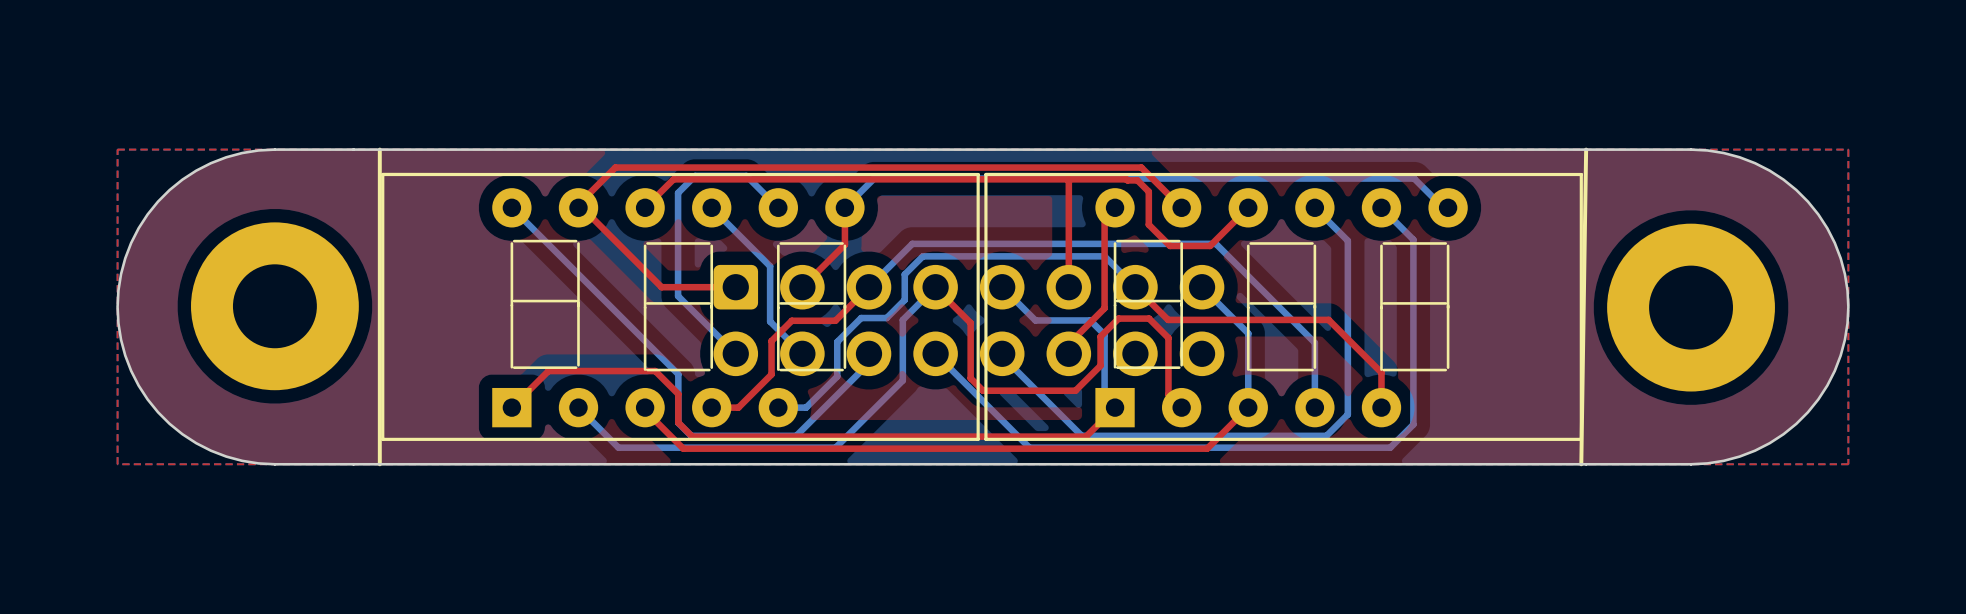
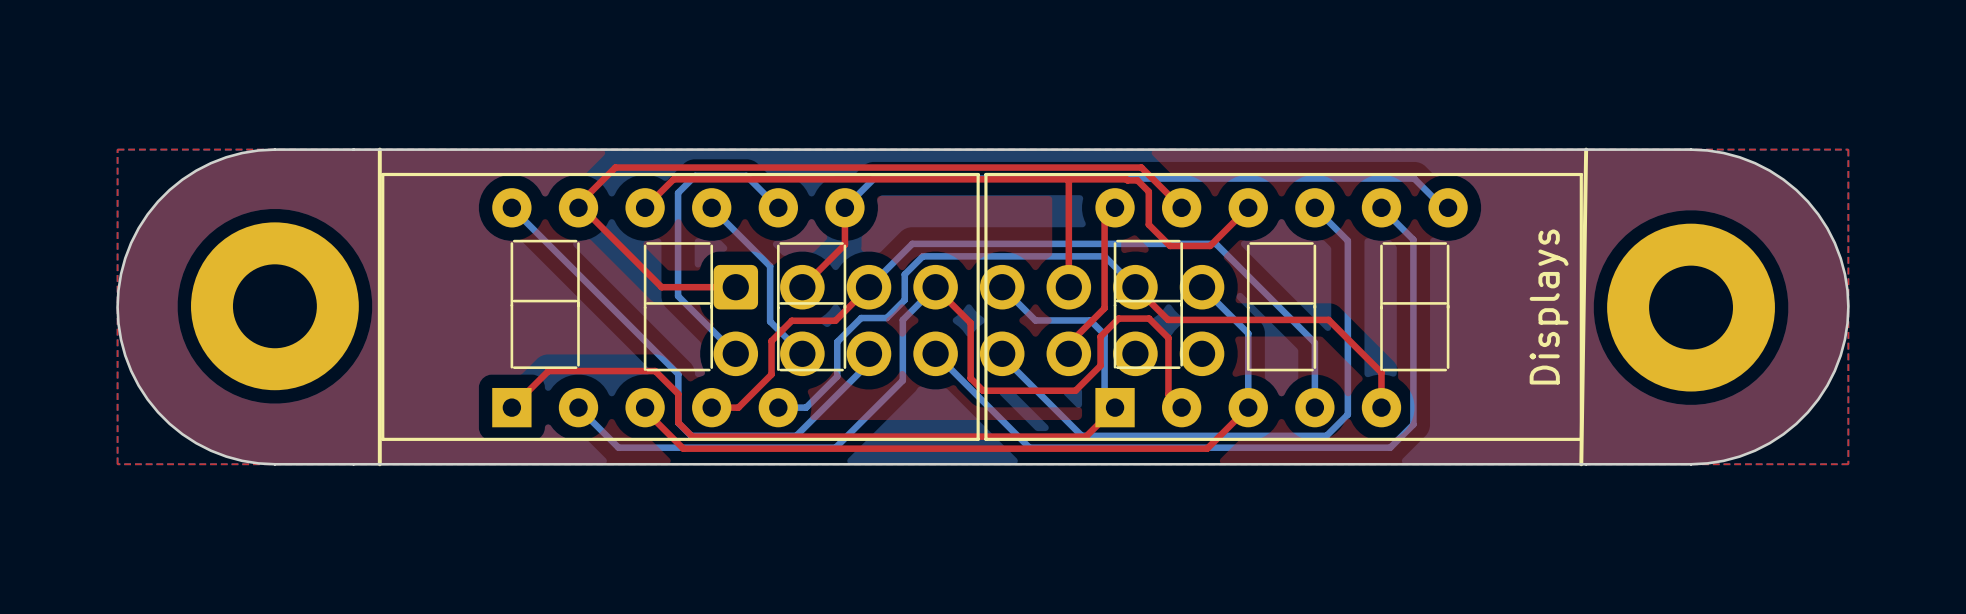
text: none -> Displays (1549, 307)

